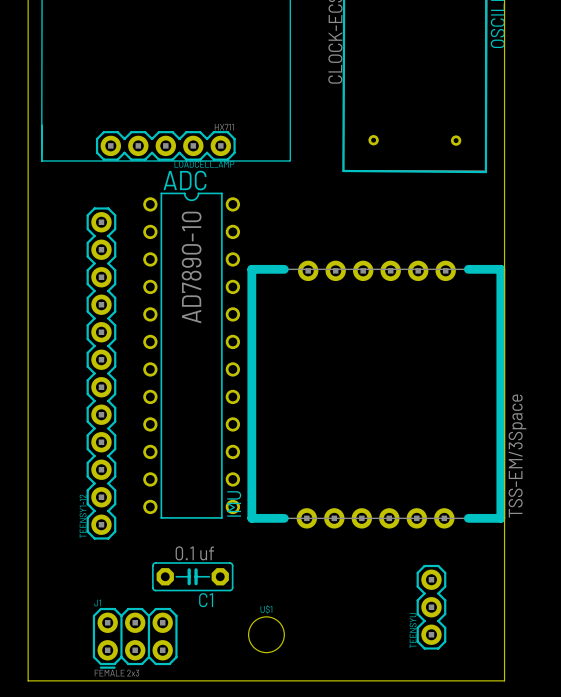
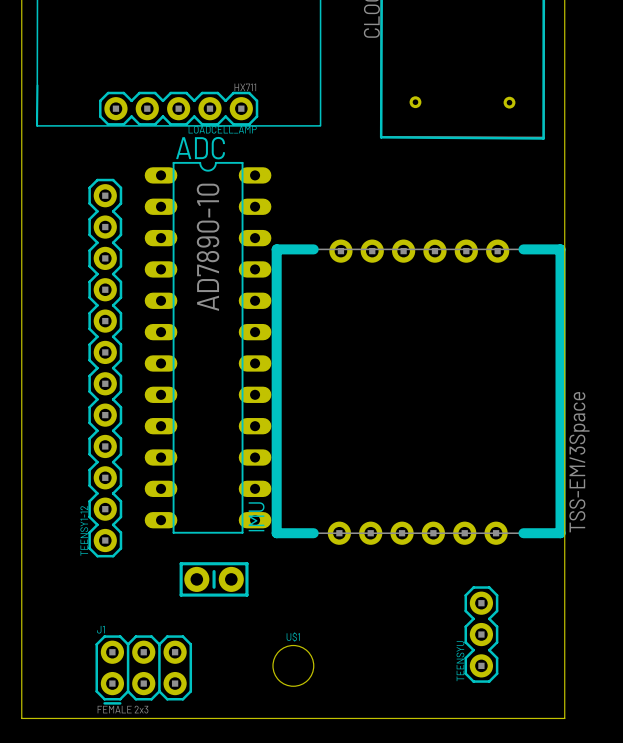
ADC footprint: [143, 192, 241, 519] -> [144, 161, 272, 534]
part: none -> (214, 579)
C1: 0.1 uf (192, 576) -> none

